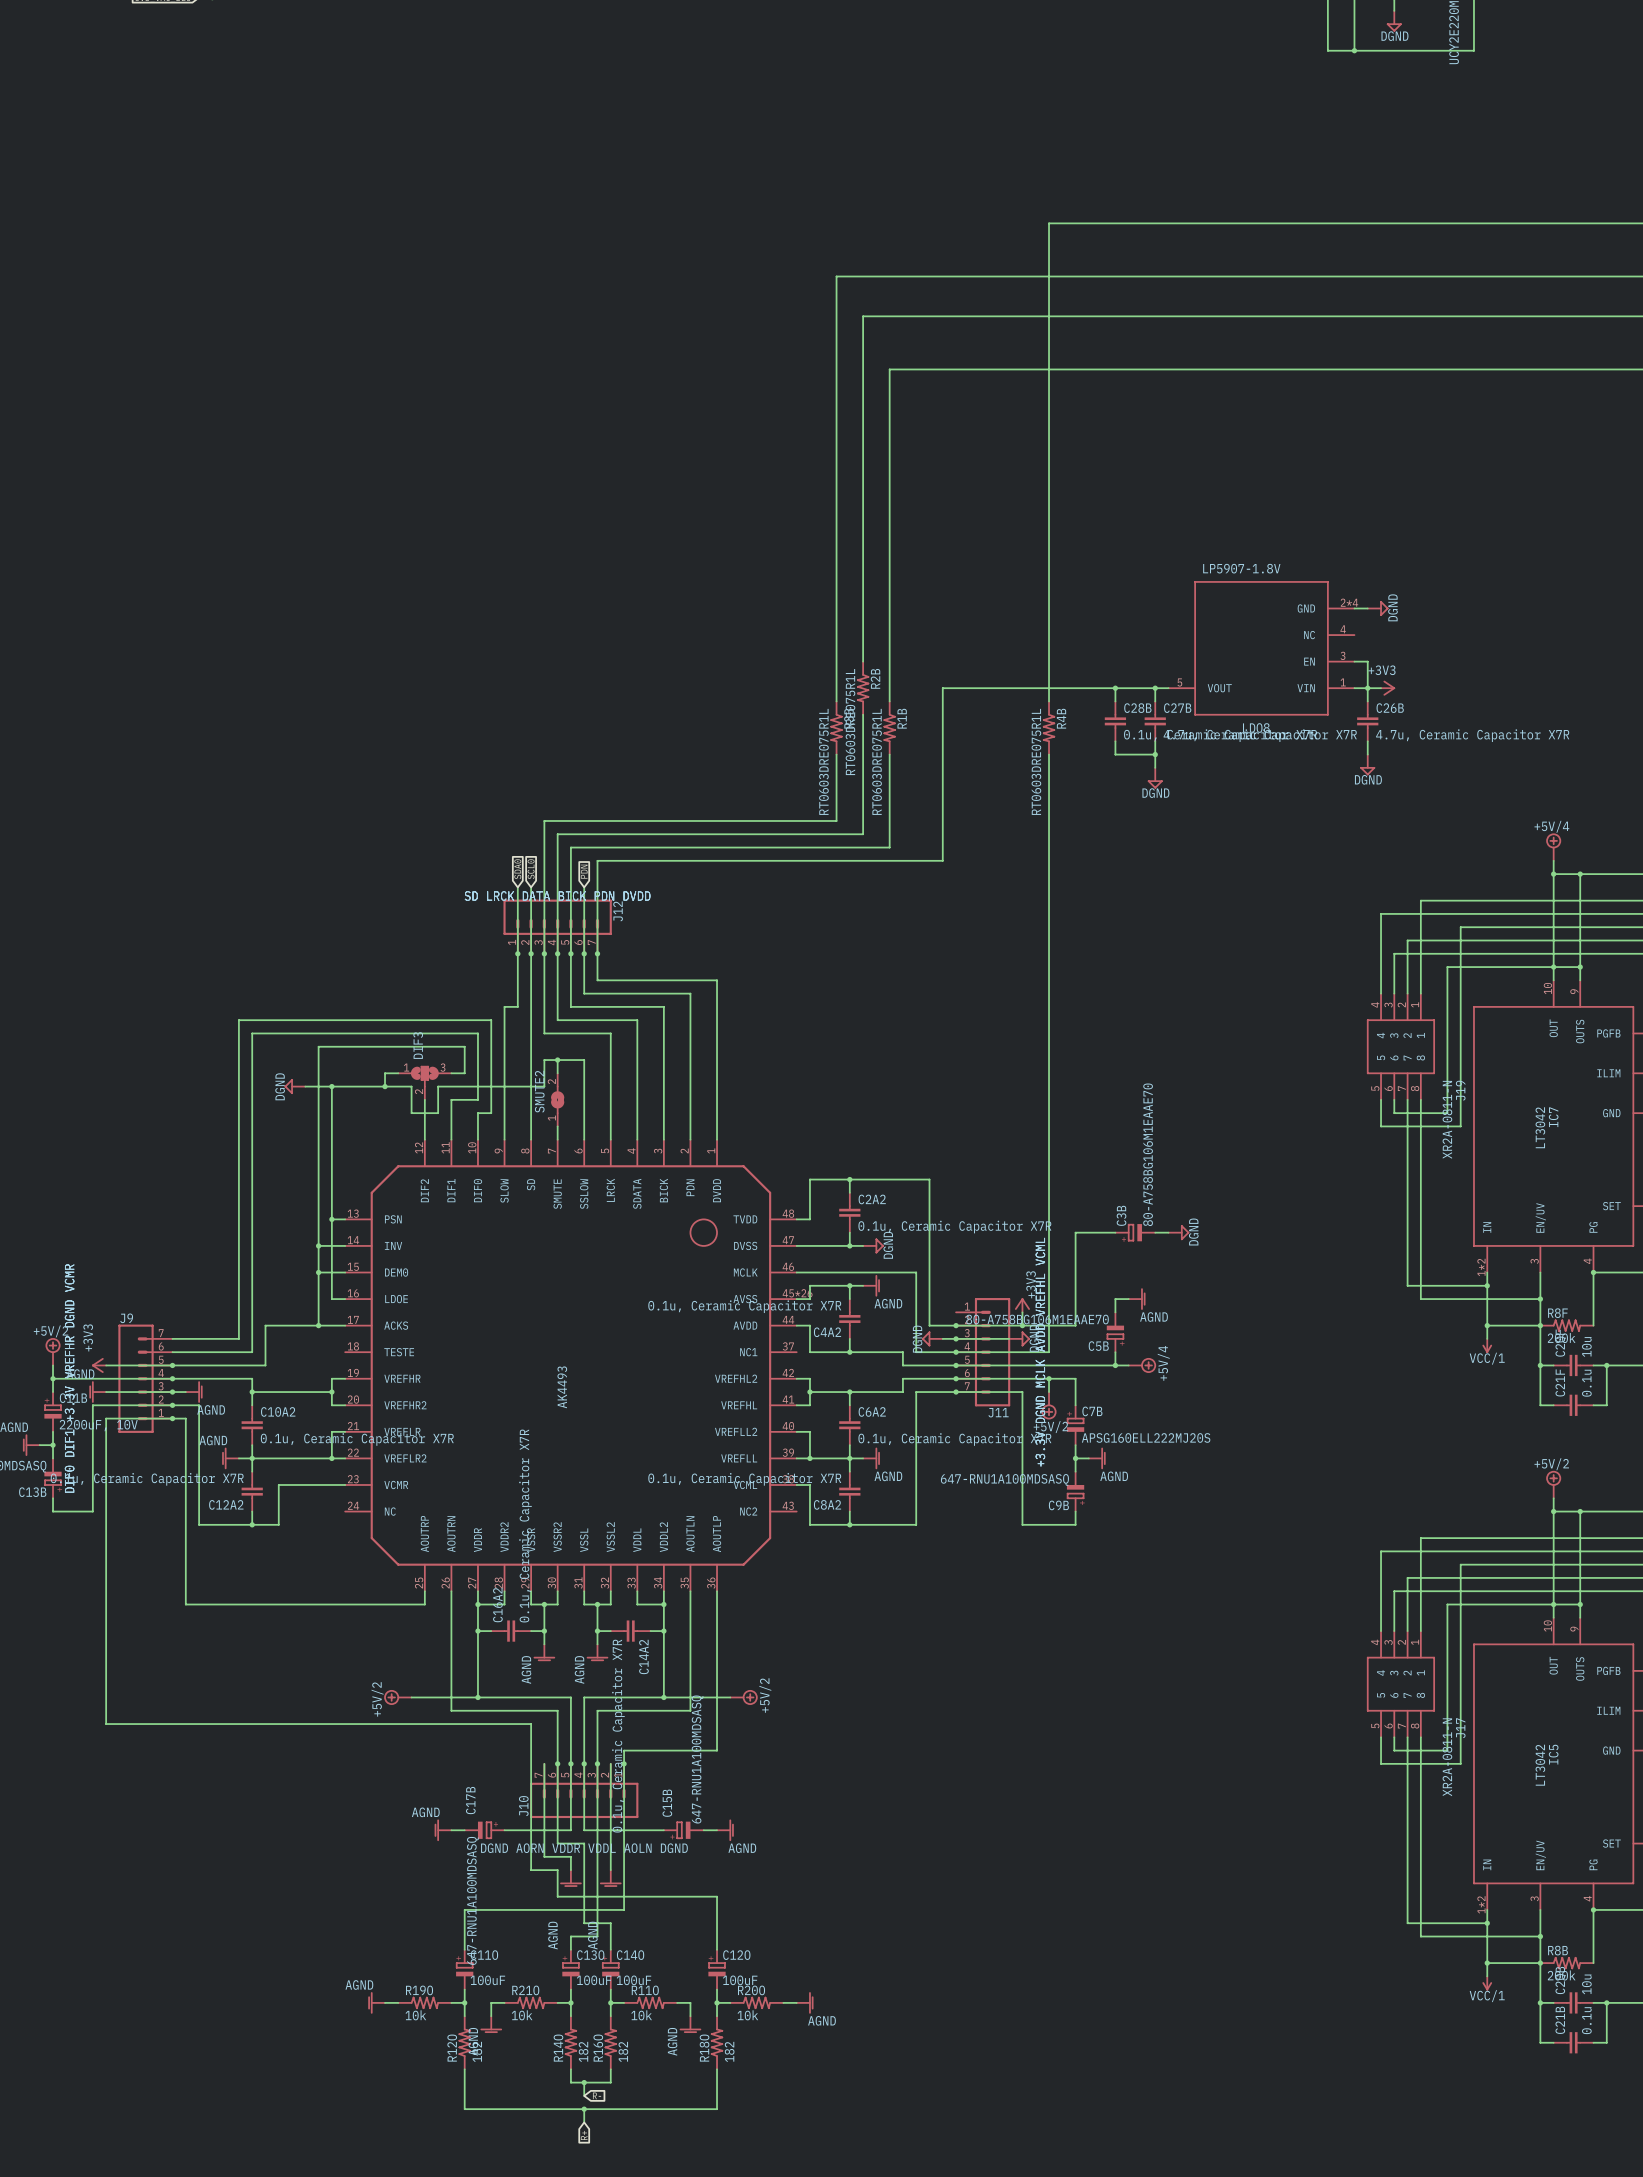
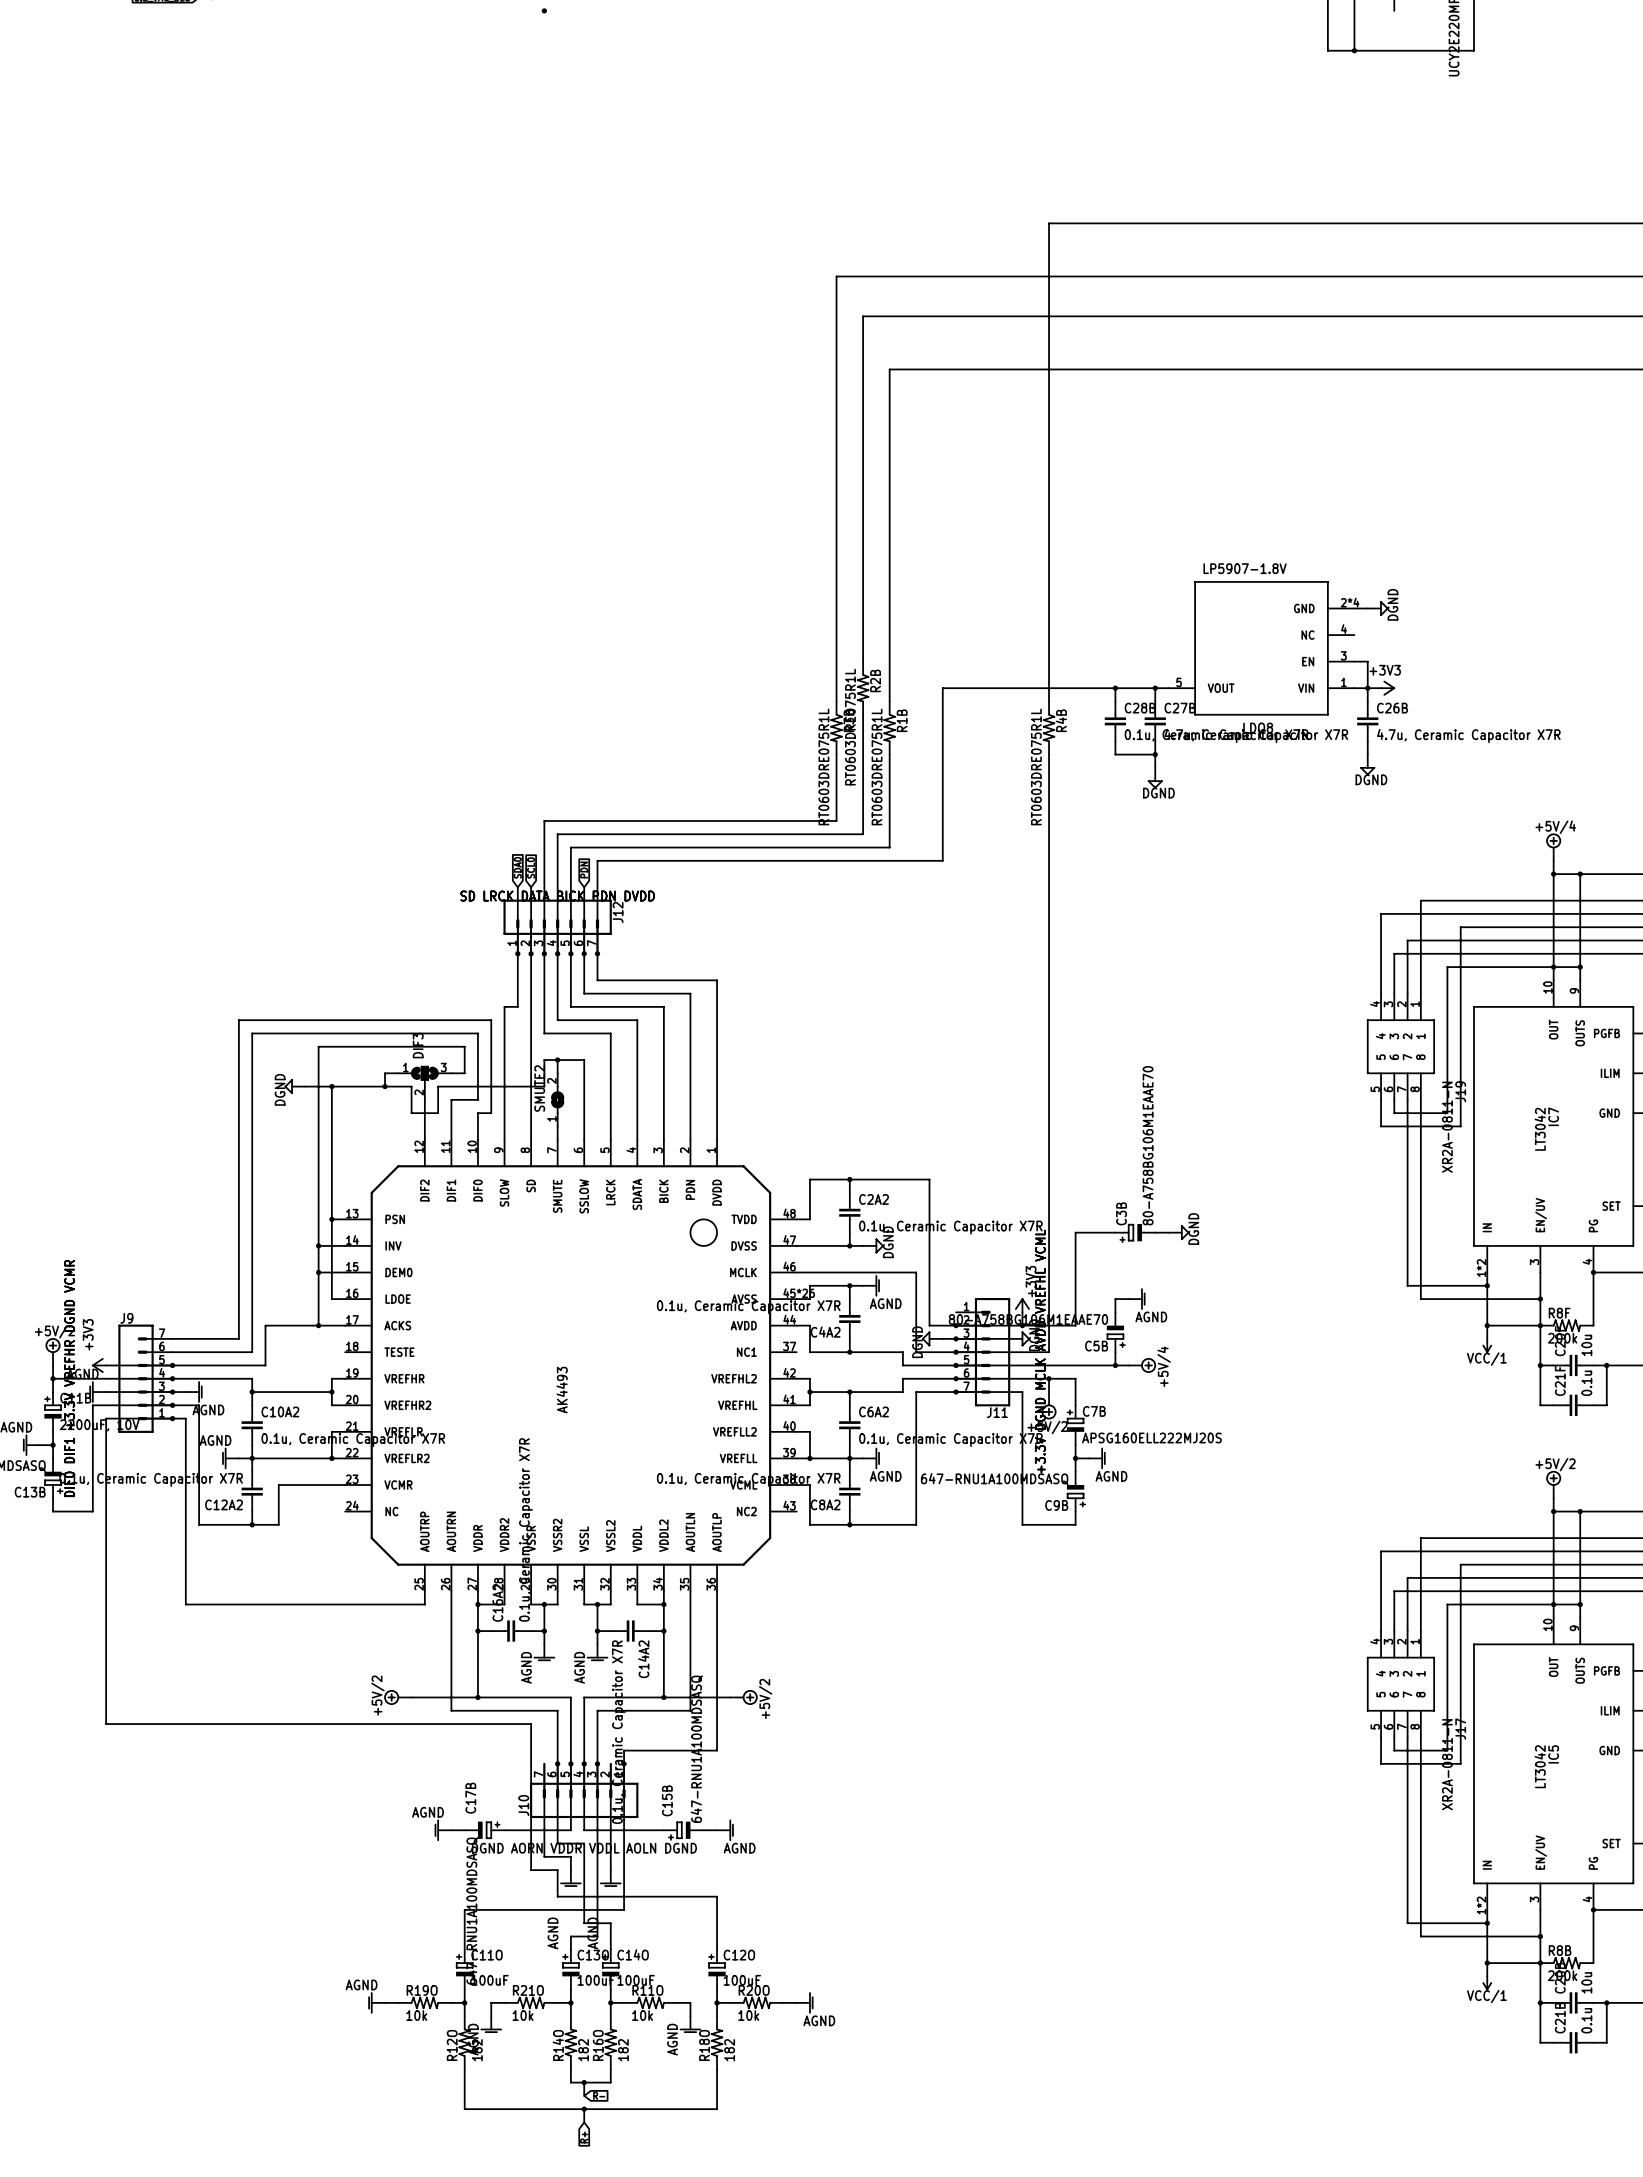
junction: none -> (544, 10)
power symbol: DGND (1394, 21) -> none

